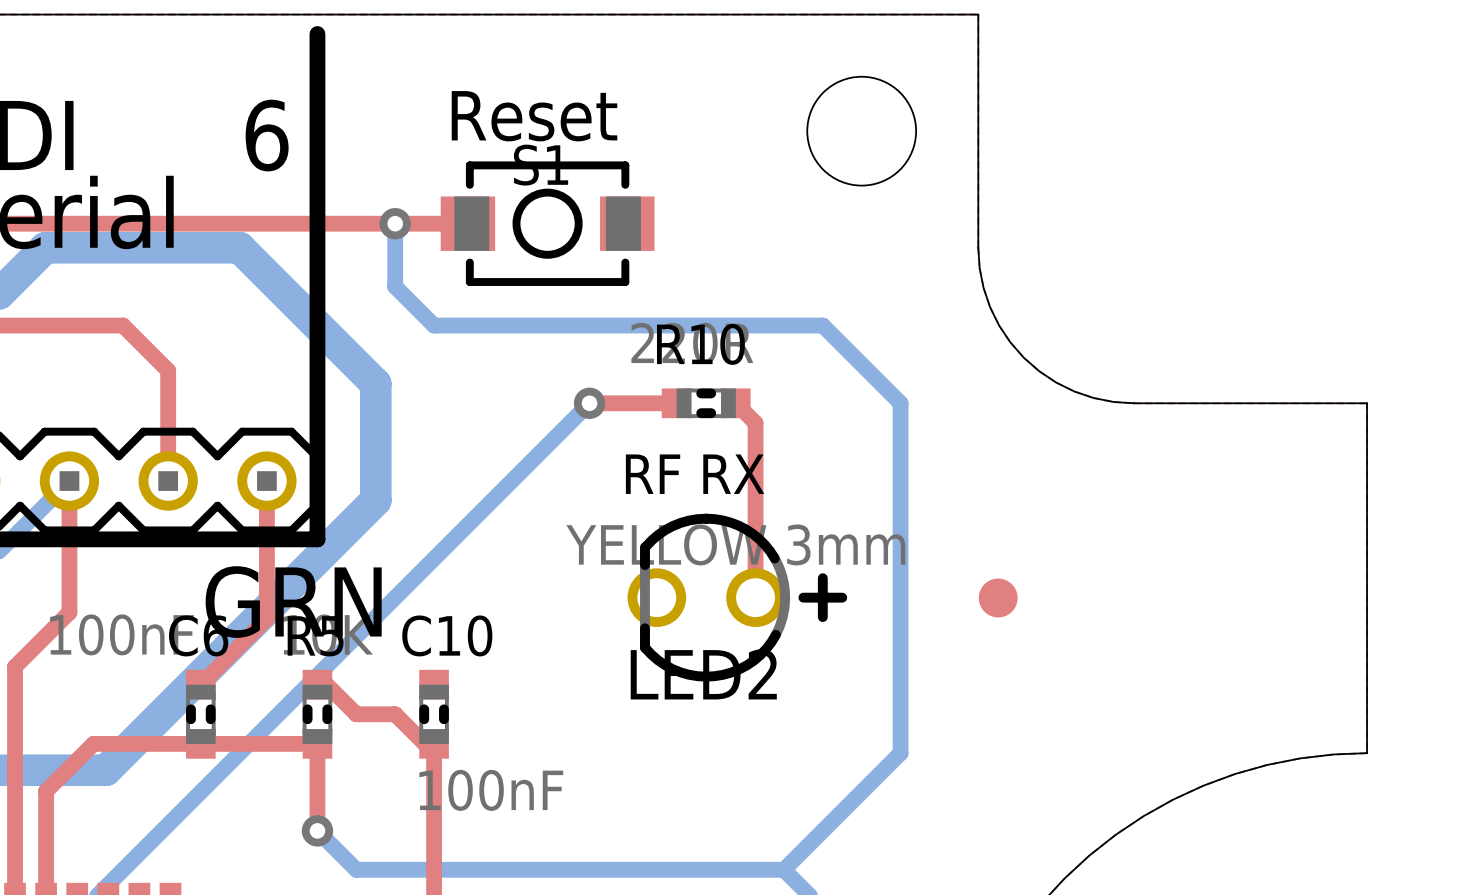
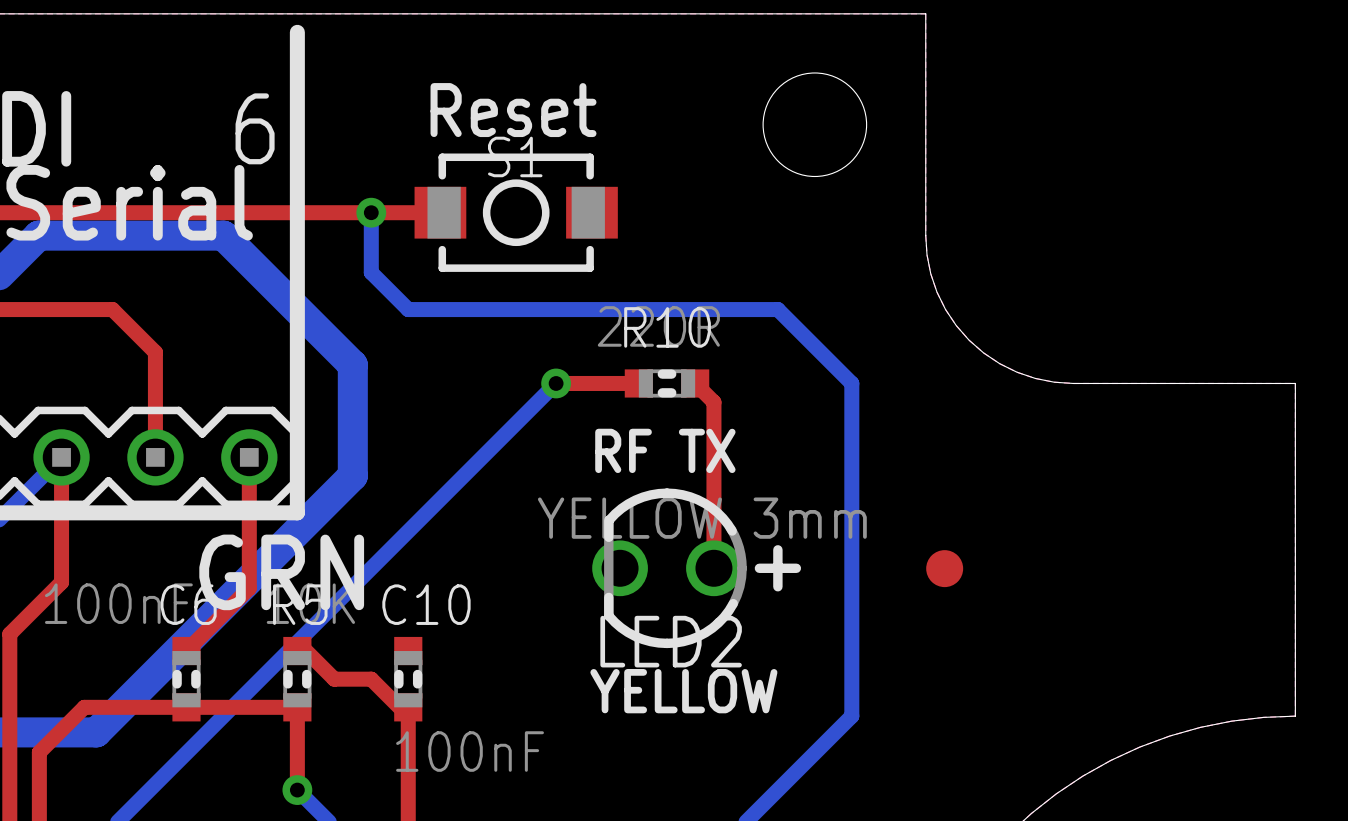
text: RF RX (695, 474) -> RF TX (665, 450)
text: none -> YELLOW (683, 691)

